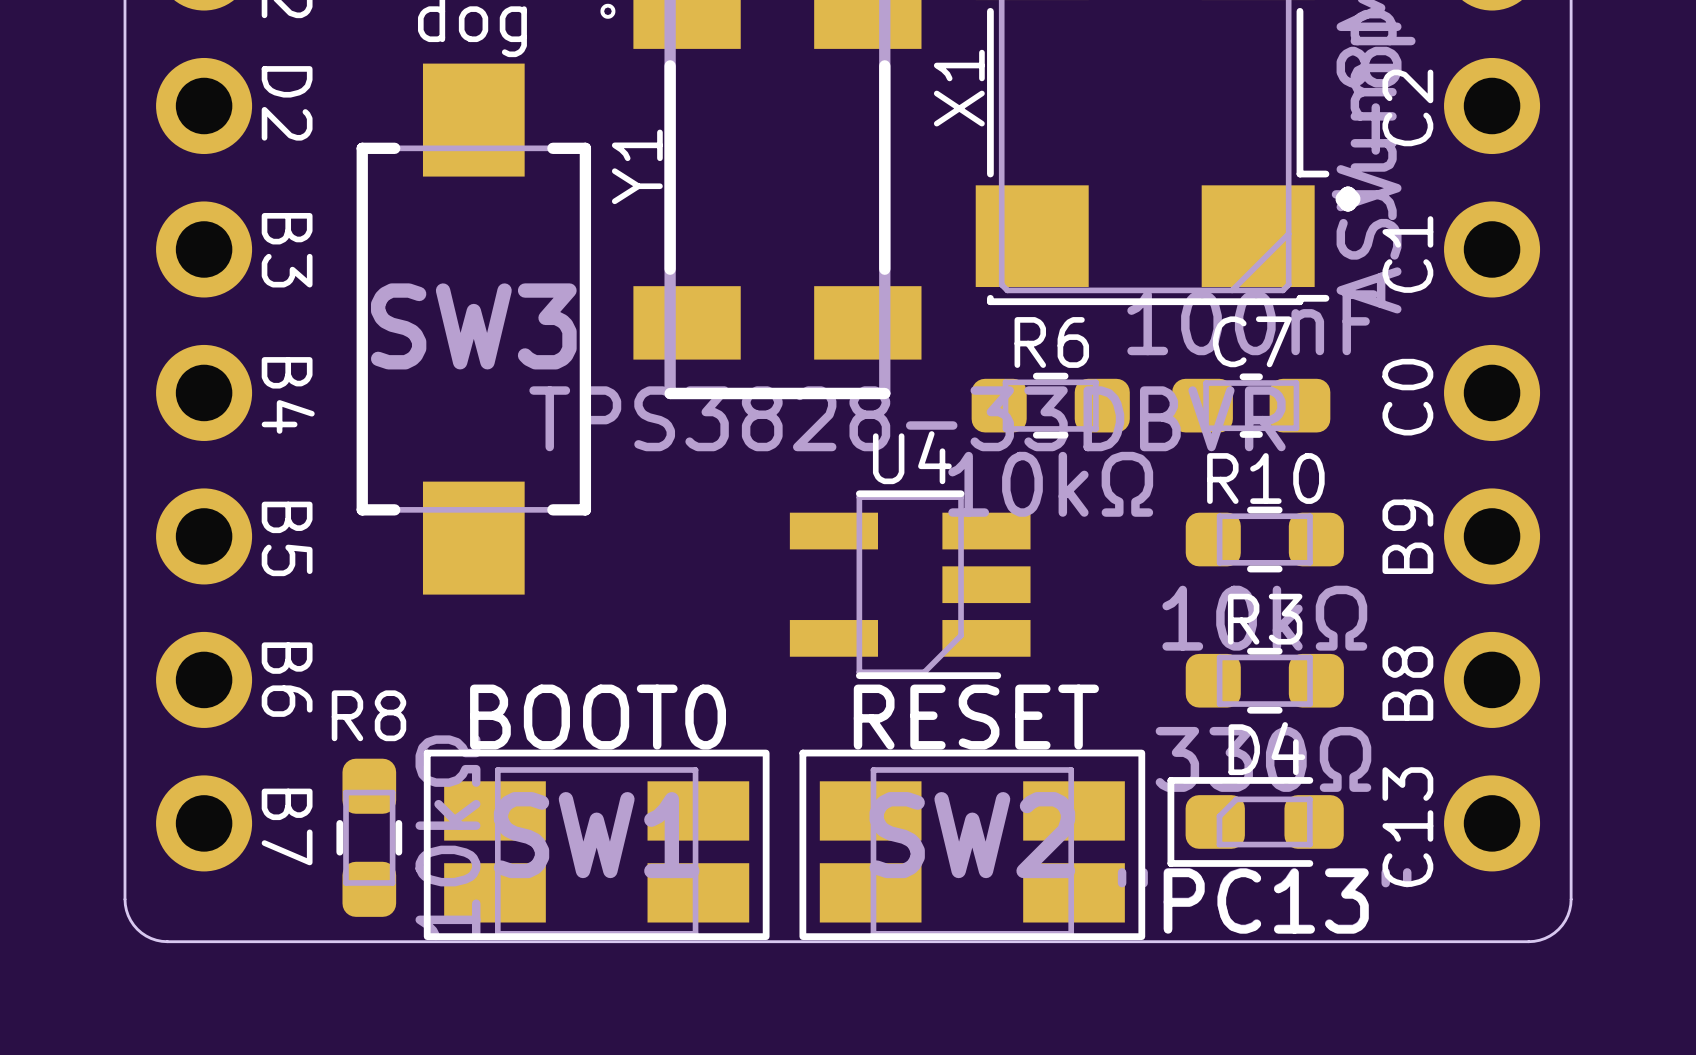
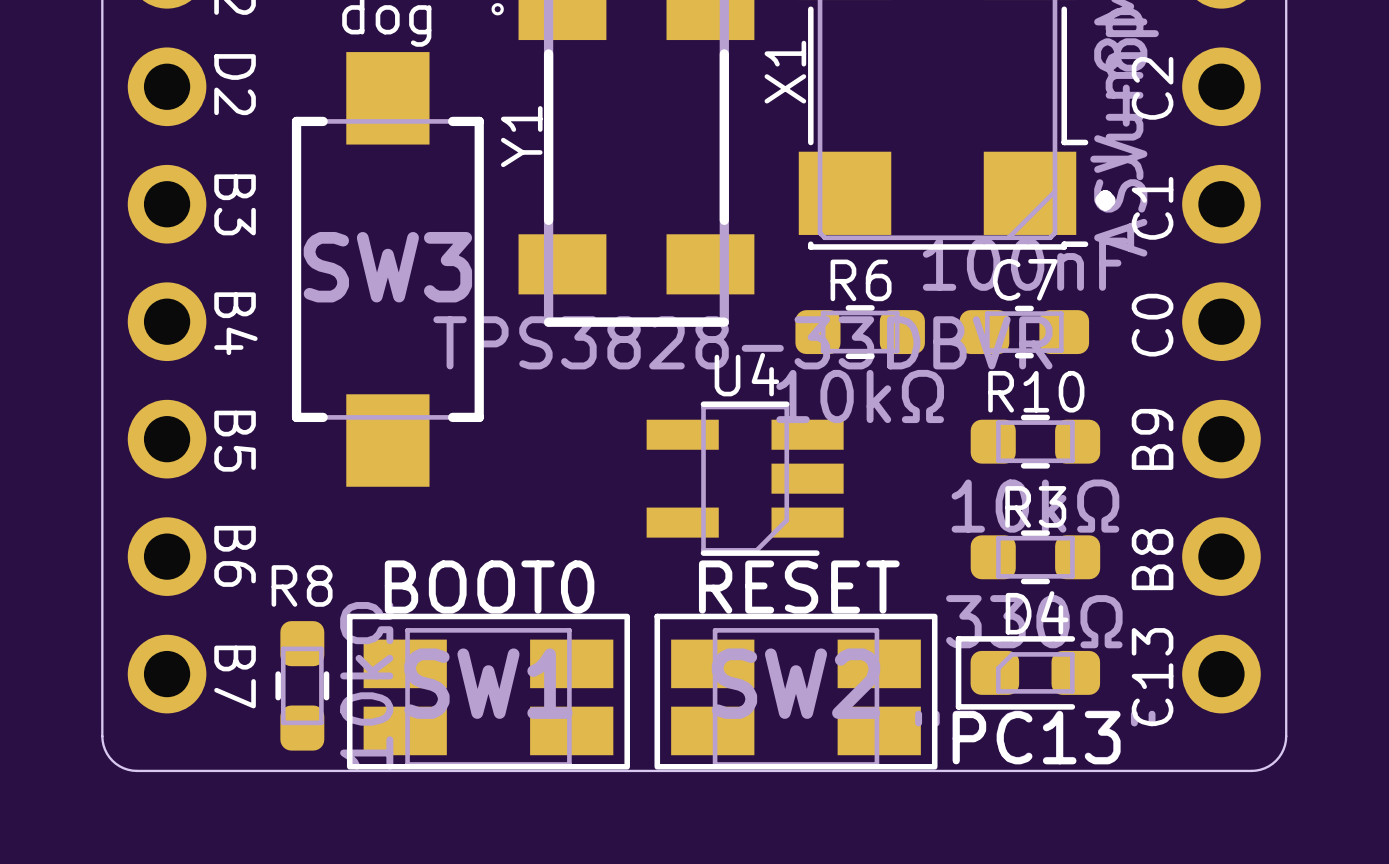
text position: . (1347, 199) -> . (1105, 200)

